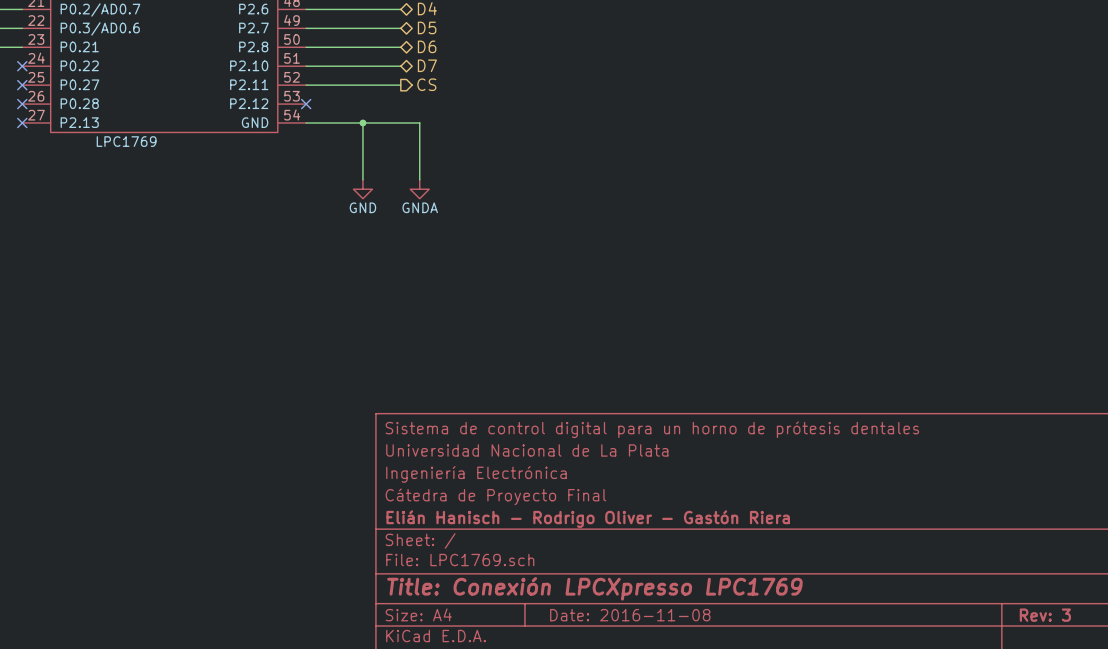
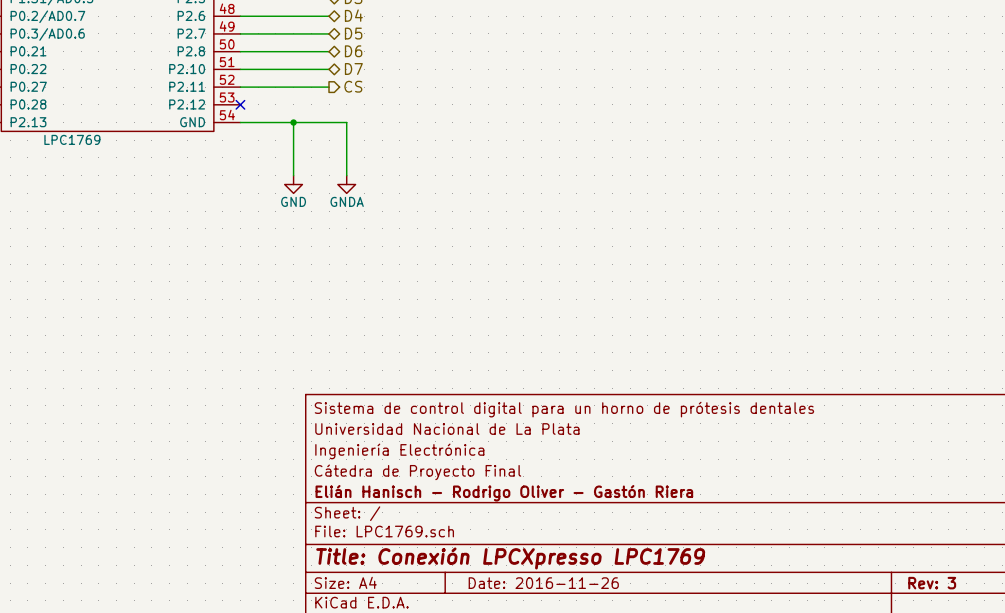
title block: Date: 2016-11-08 (630, 615) -> Date: 2016-11-26 (543, 583)

